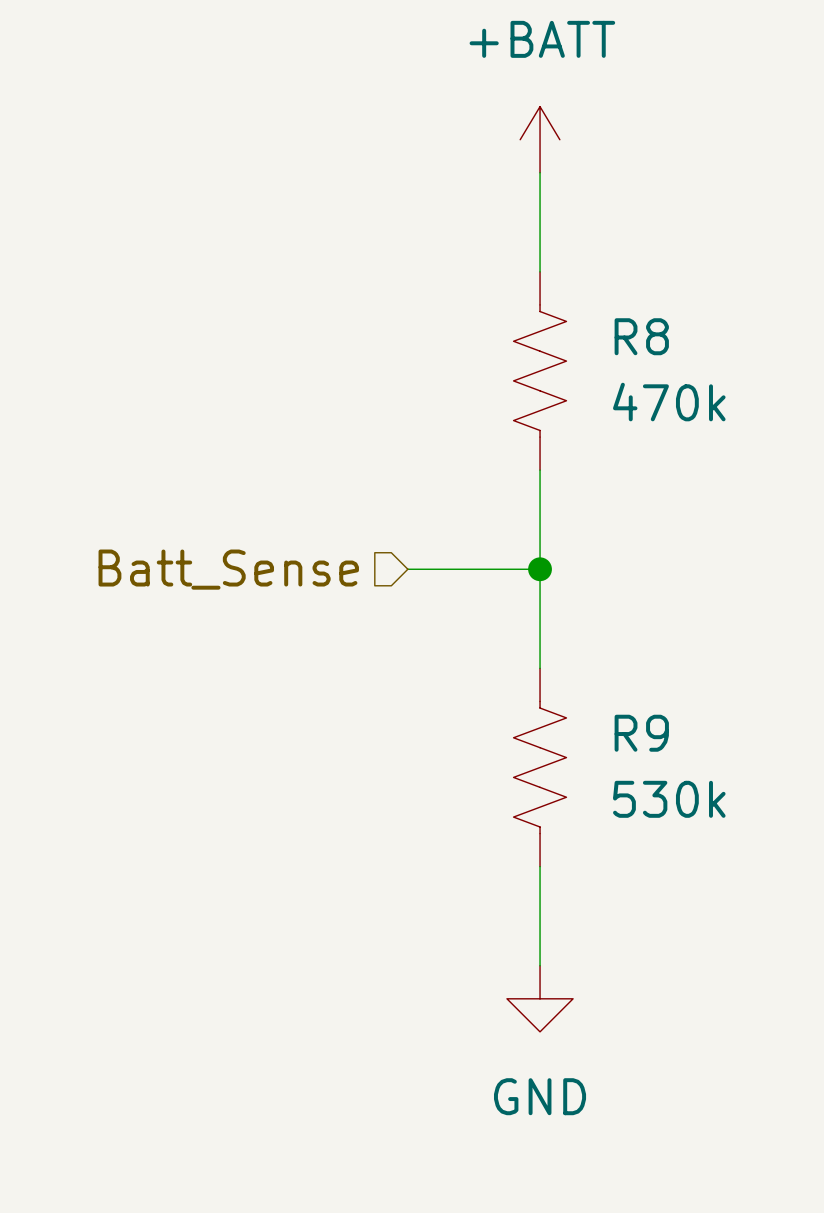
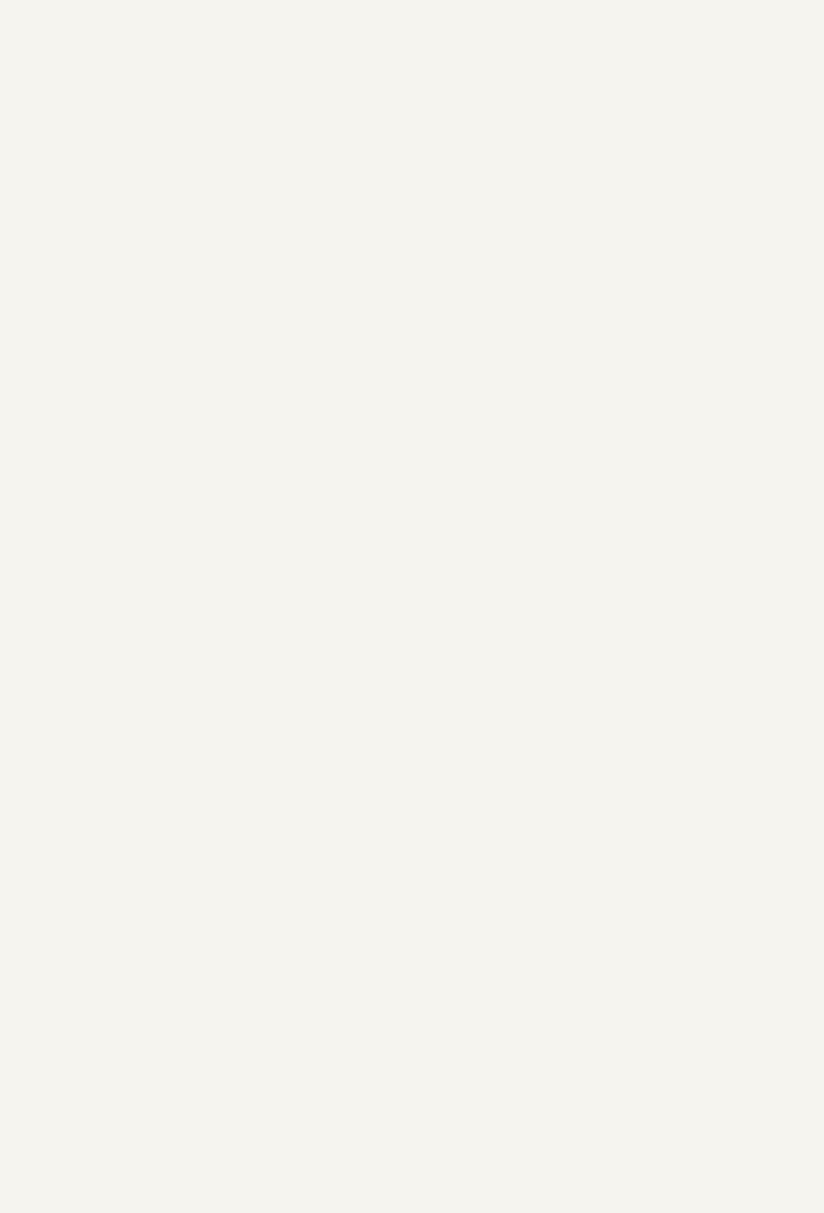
power symbol: +BATT (540, 139) -> none
wire: (540, 172) (540, 271) -> none
R8: 470k (540, 371) -> none
wire: (540, 470) (540, 668) -> none
hierarchical label: Batt_Sense (228, 569) -> none
wire: (407, 569) (540, 569) -> none
junction: (540, 569) -> none
R9: 530k (540, 767) -> none
wire: (540, 866) (540, 965) -> none
power symbol: GND (540, 998) -> none

